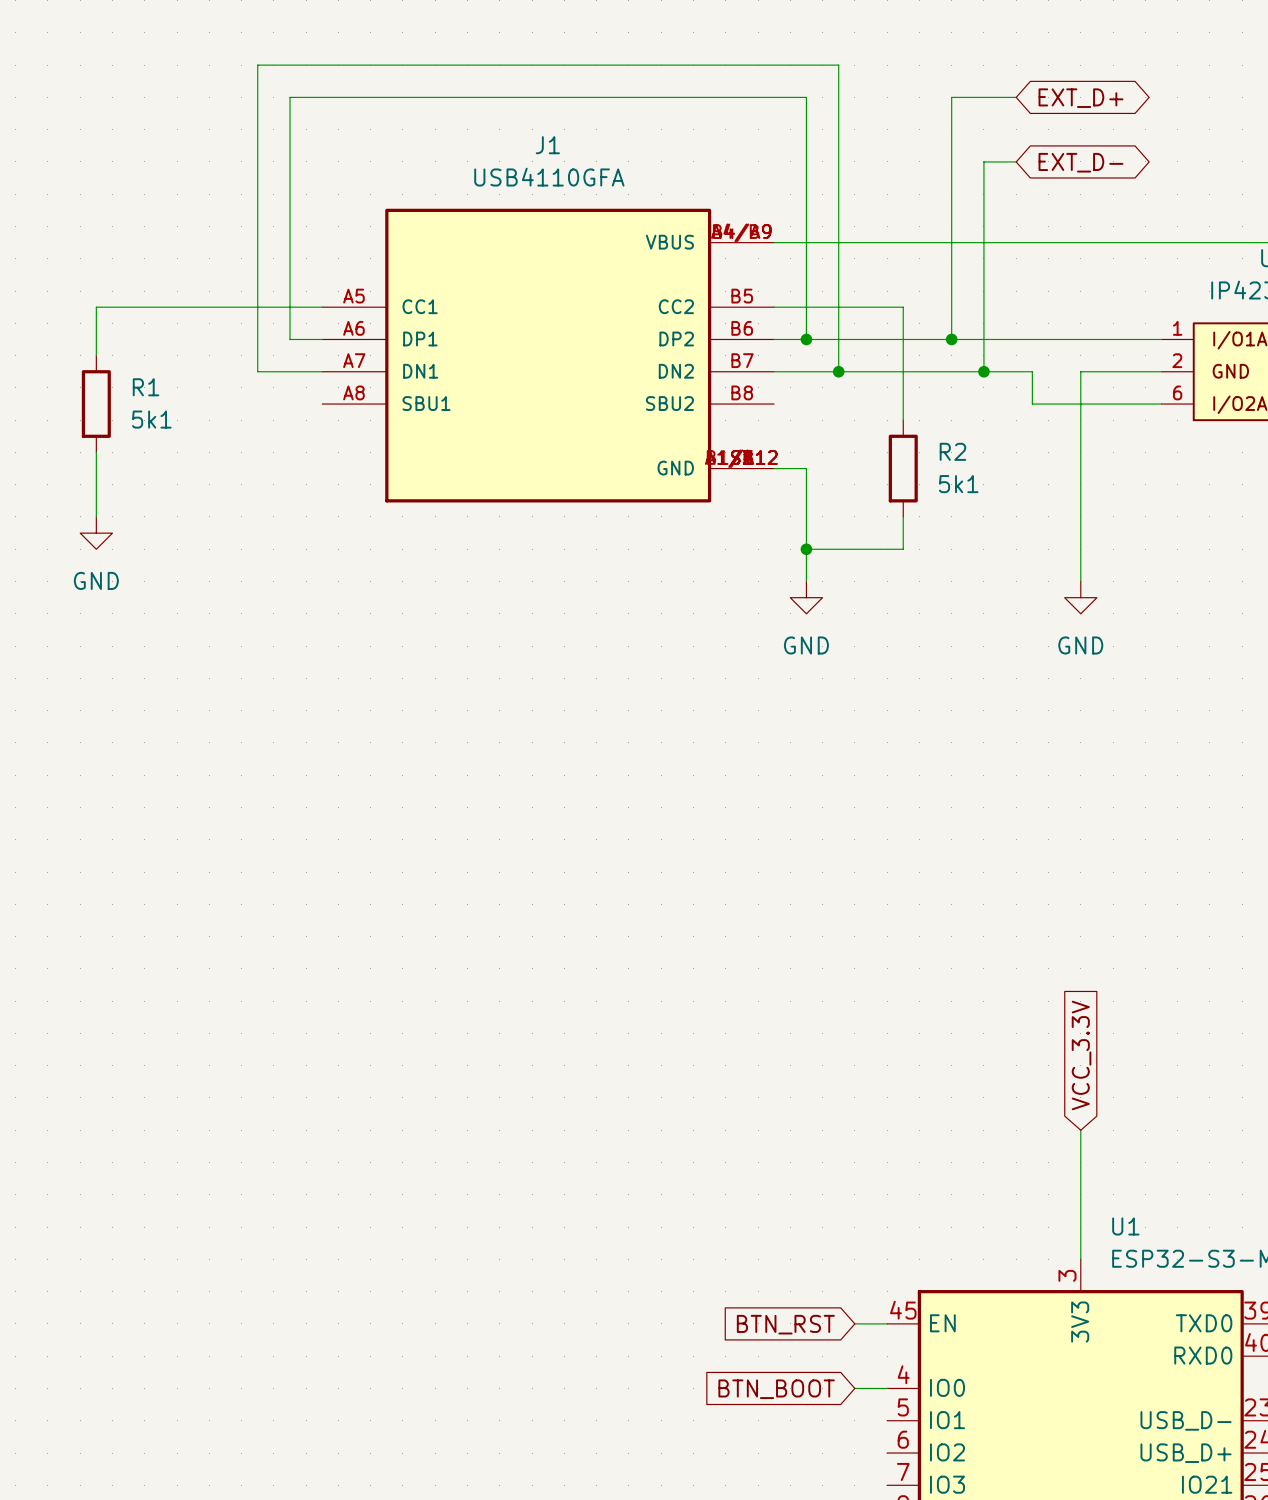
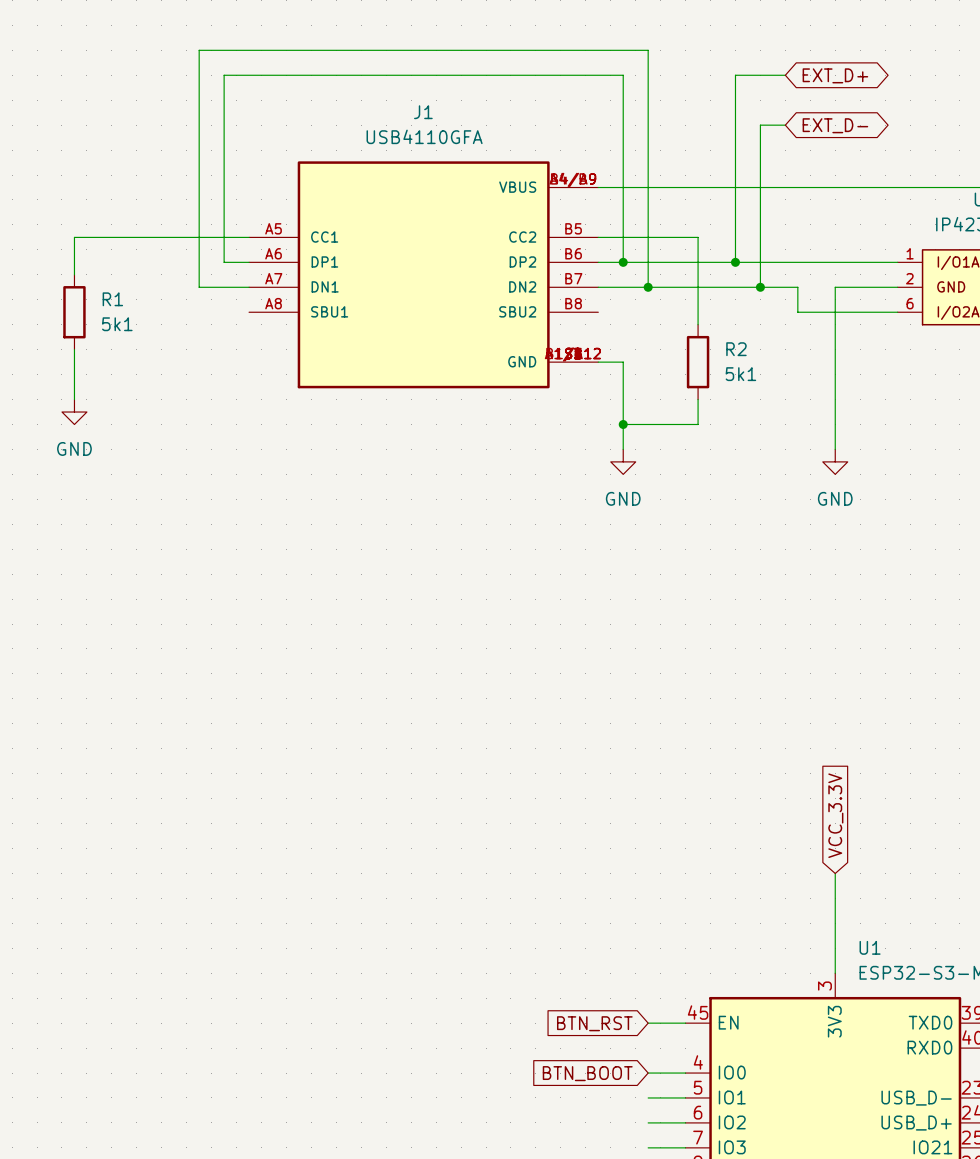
wire: none -> (648, 1023) (660, 1023)
global label position: BTN_RST (785, 1324) -> BTN_RST (594, 1023)
wire: none -> (648, 1073) (660, 1073)
global label position: BTN_BOOT (776, 1389) -> BTN_BOOT (587, 1073)
wire: none -> (648, 1097) (685, 1097)
wire: none -> (648, 1122) (685, 1122)
wire: none -> (648, 1147) (685, 1147)

